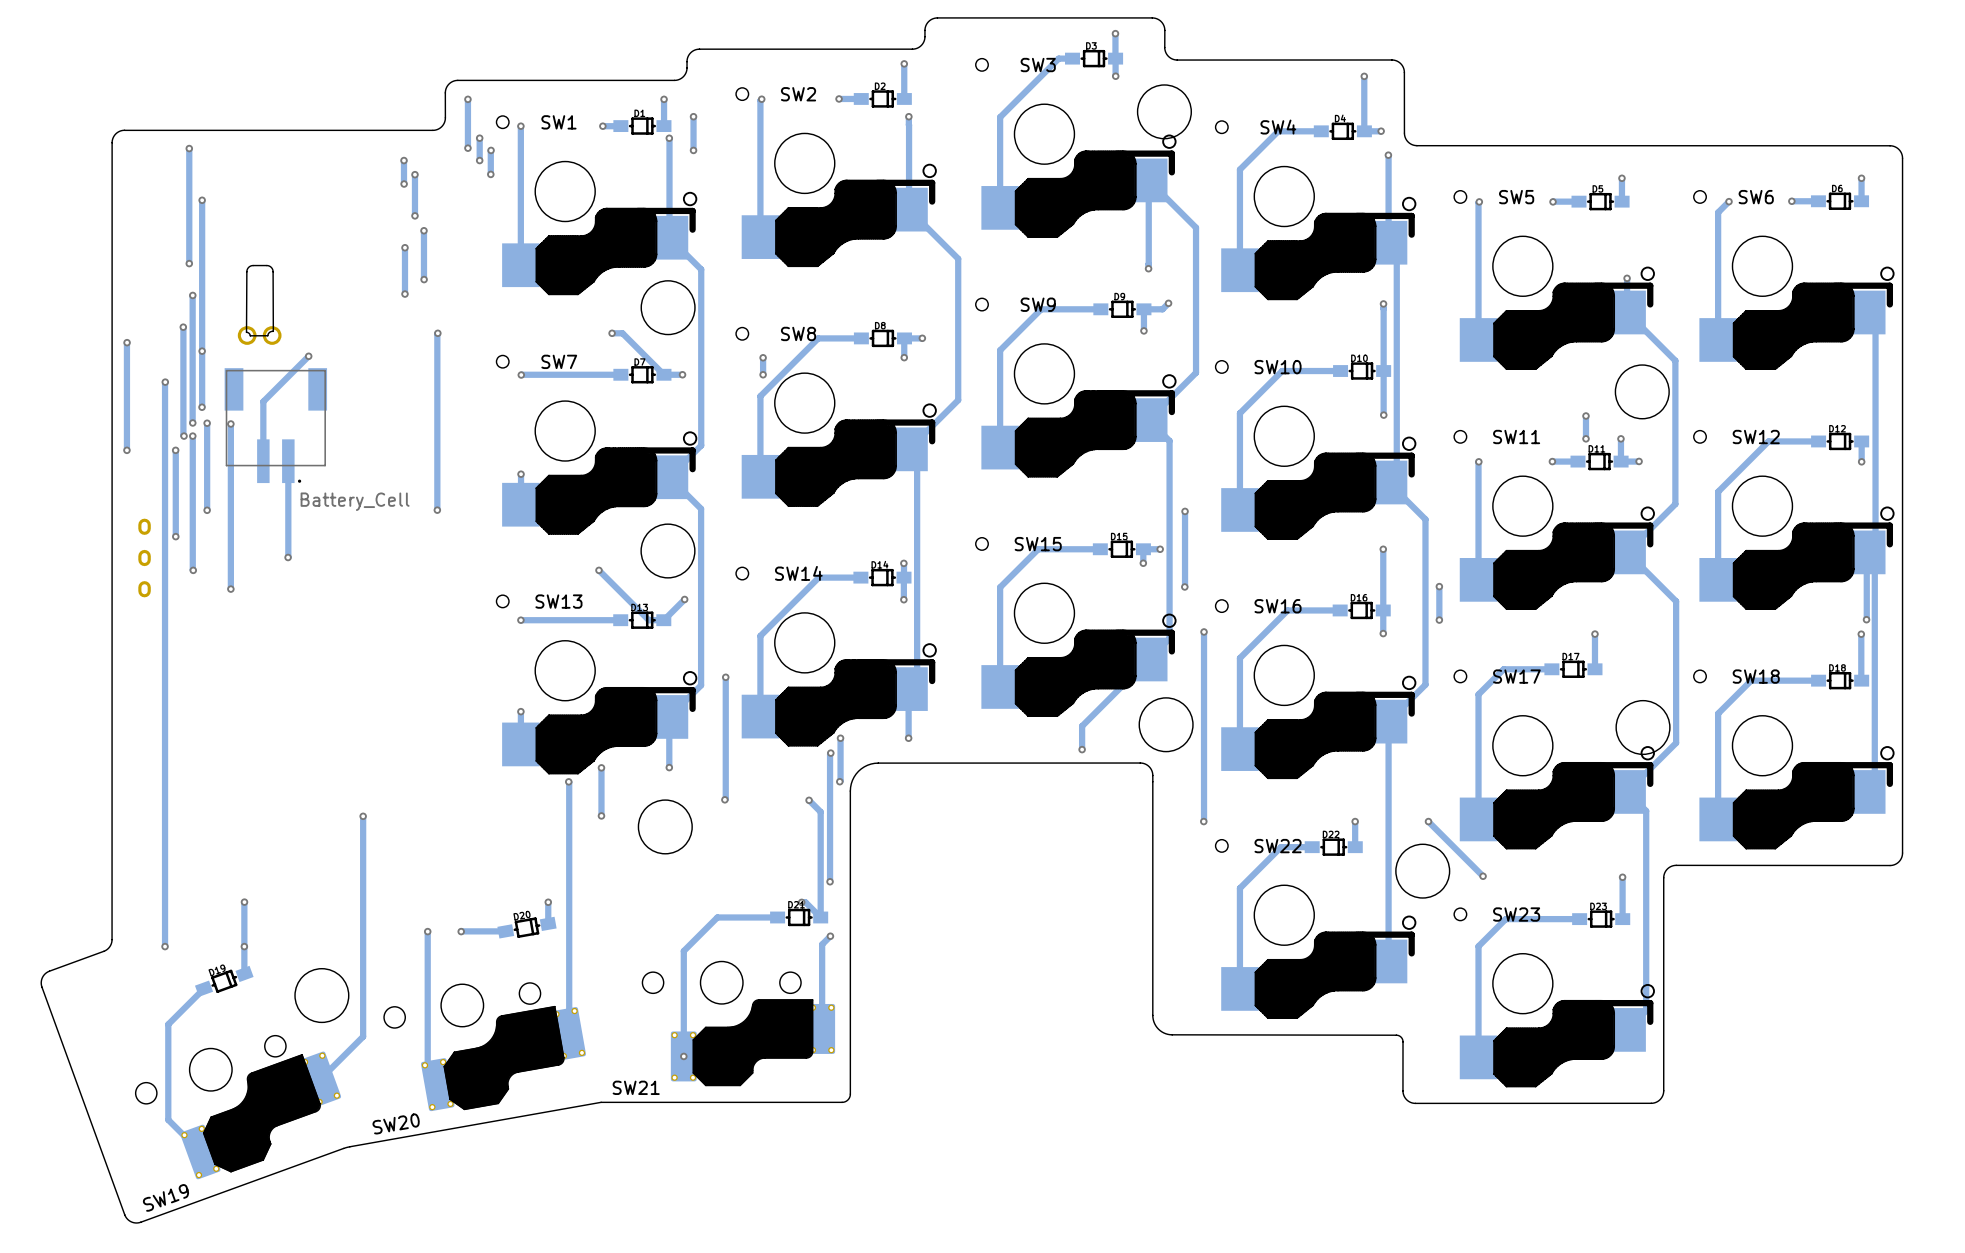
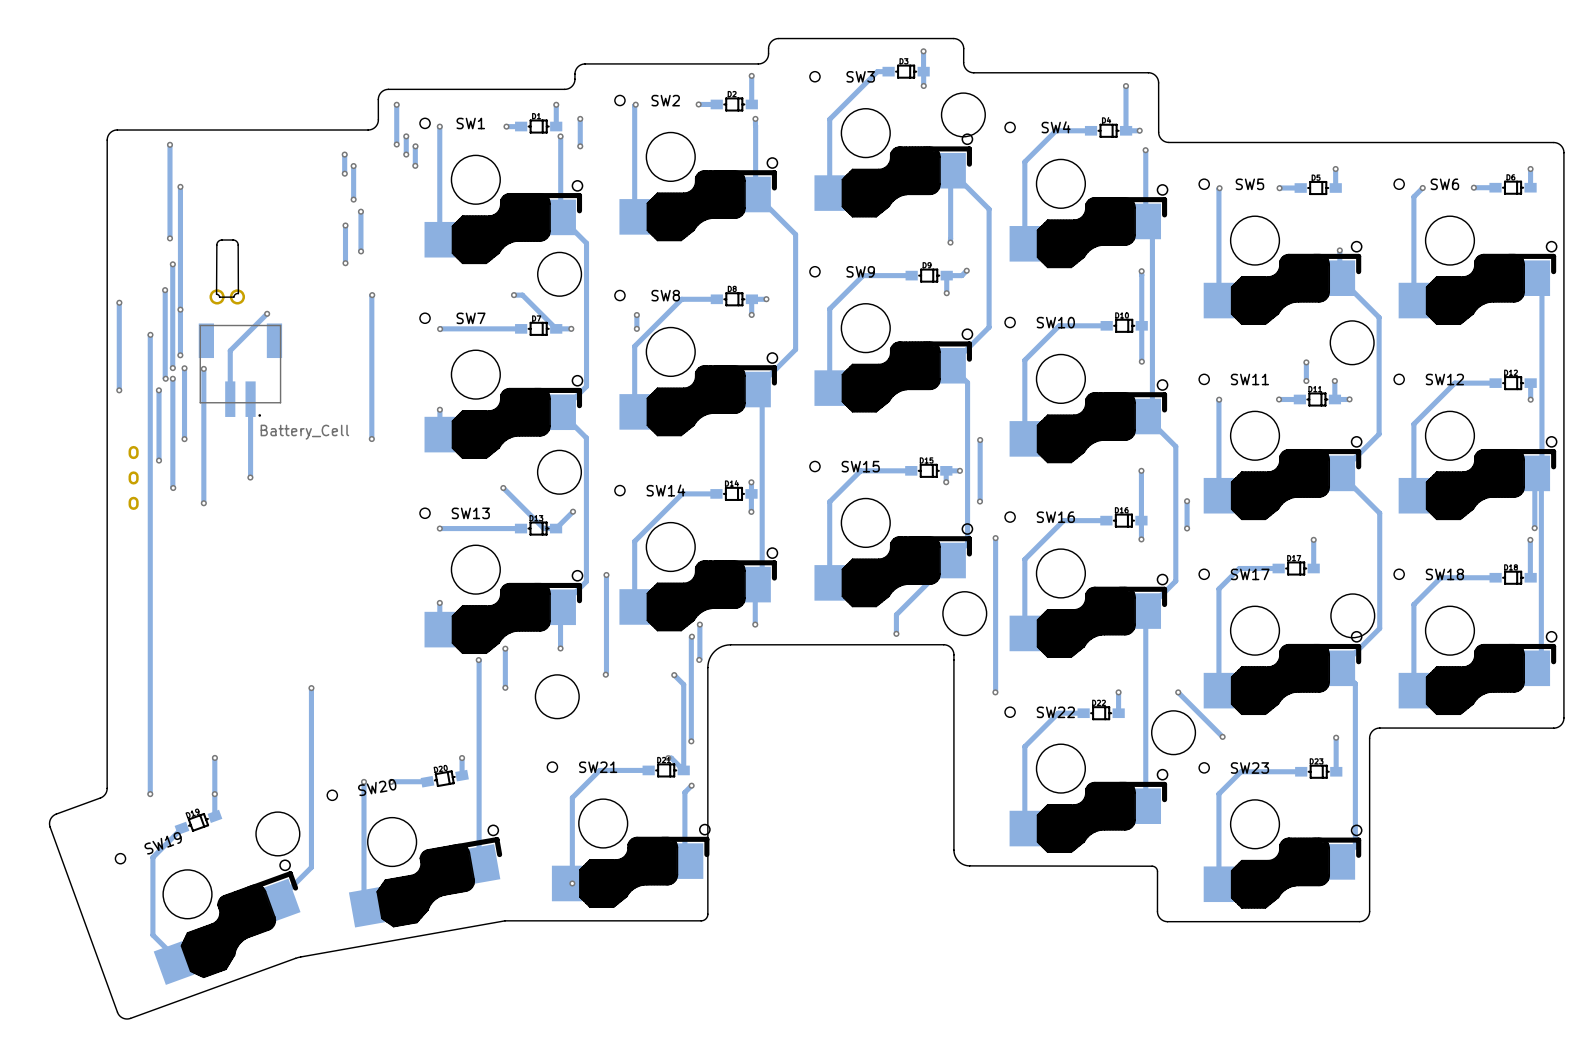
SW21 footprint: [642, 961, 836, 1087] -> [547, 762, 711, 908]
SW20 footprint: [384, 982, 586, 1112] -> [327, 790, 503, 928]
SW19 footprint: [135, 1035, 342, 1180] -> [115, 853, 301, 985]
SW21 name position: SW21 (636, 1087) -> SW21 (598, 767)
SW20 name position: SW20 (396, 1123) -> SW20 (377, 787)
SW19 name position: SW19 (165, 1197) -> SW19 (163, 843)

